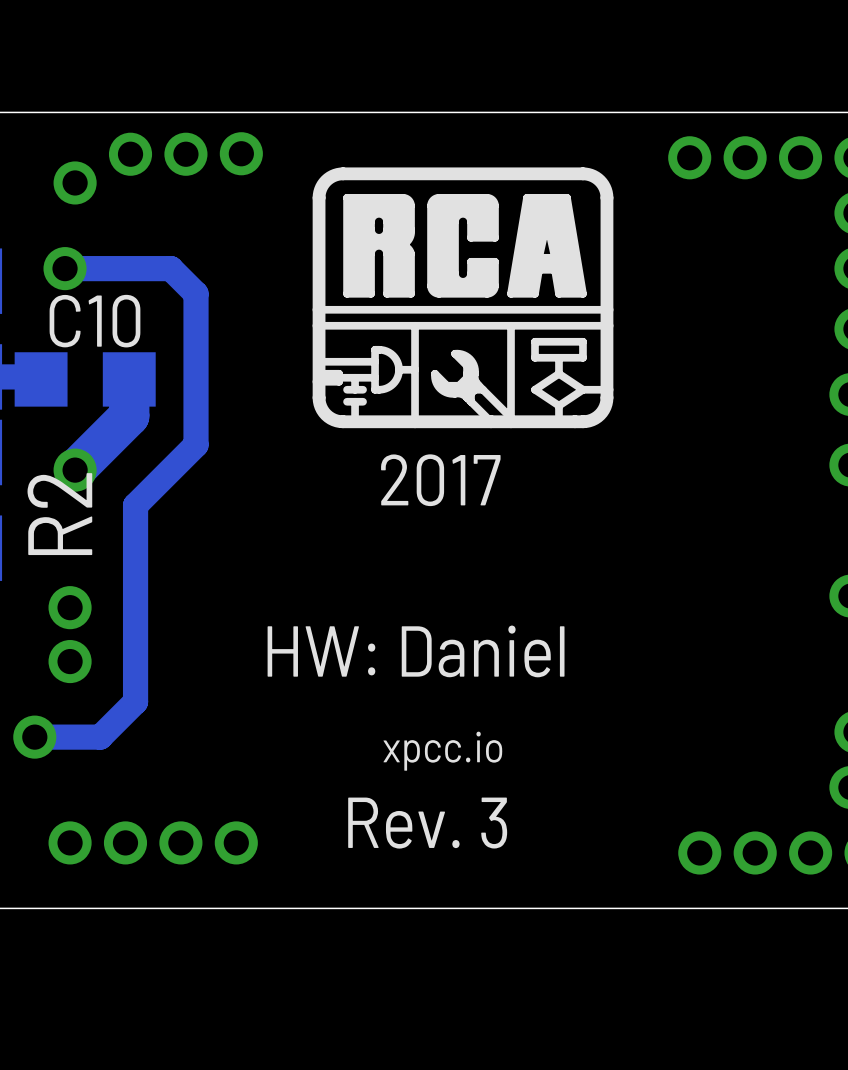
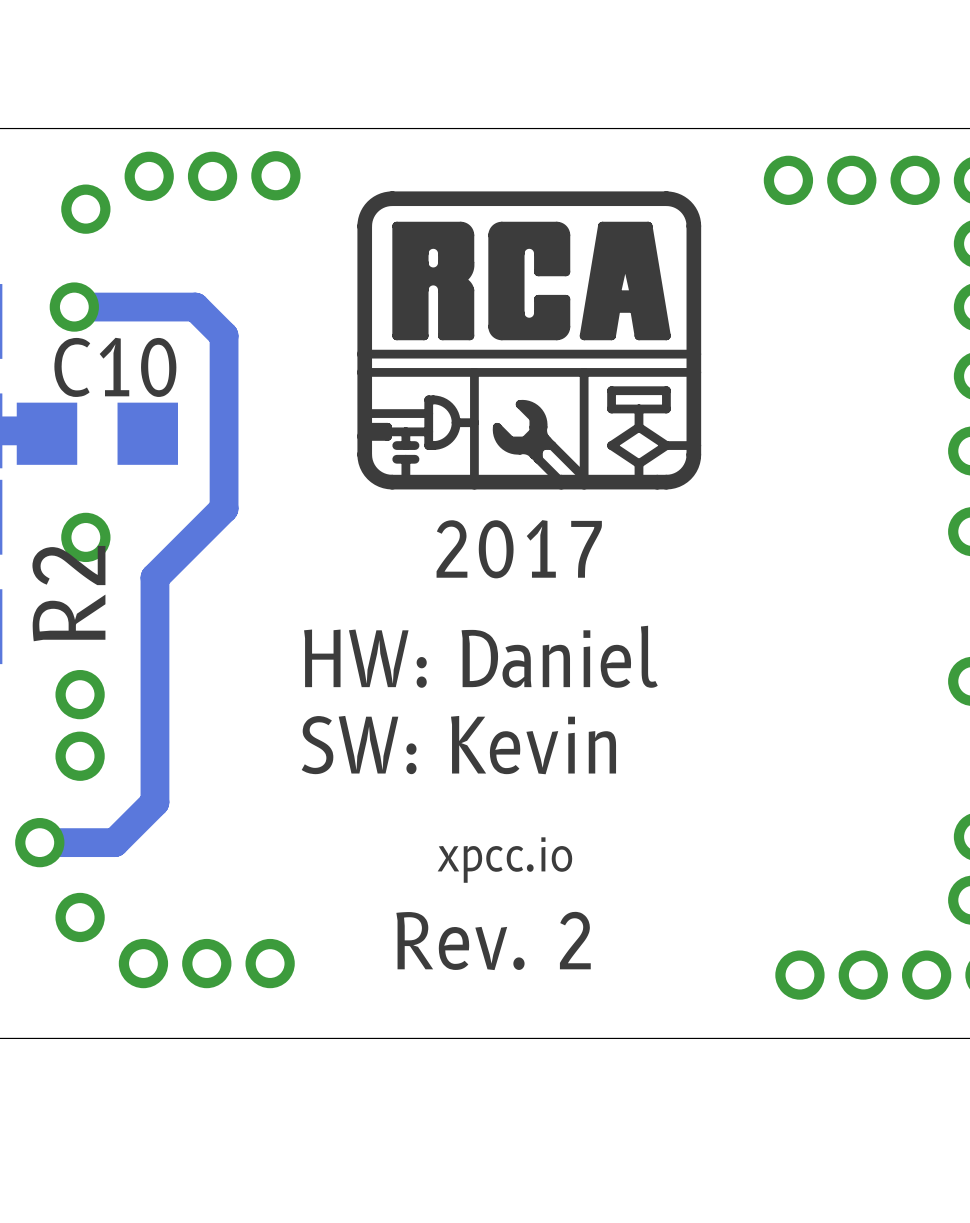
track: (129, 379) (129, 415) (75, 470) -> none
text: none -> HW: Daniel (480, 656)
text: HW: Daniel (416, 651) -> SW: Kevin (458, 745)
text: Rev. 3 (427, 823) -> Rev. 2 (493, 940)
via position: (70, 842) -> (80, 917)

